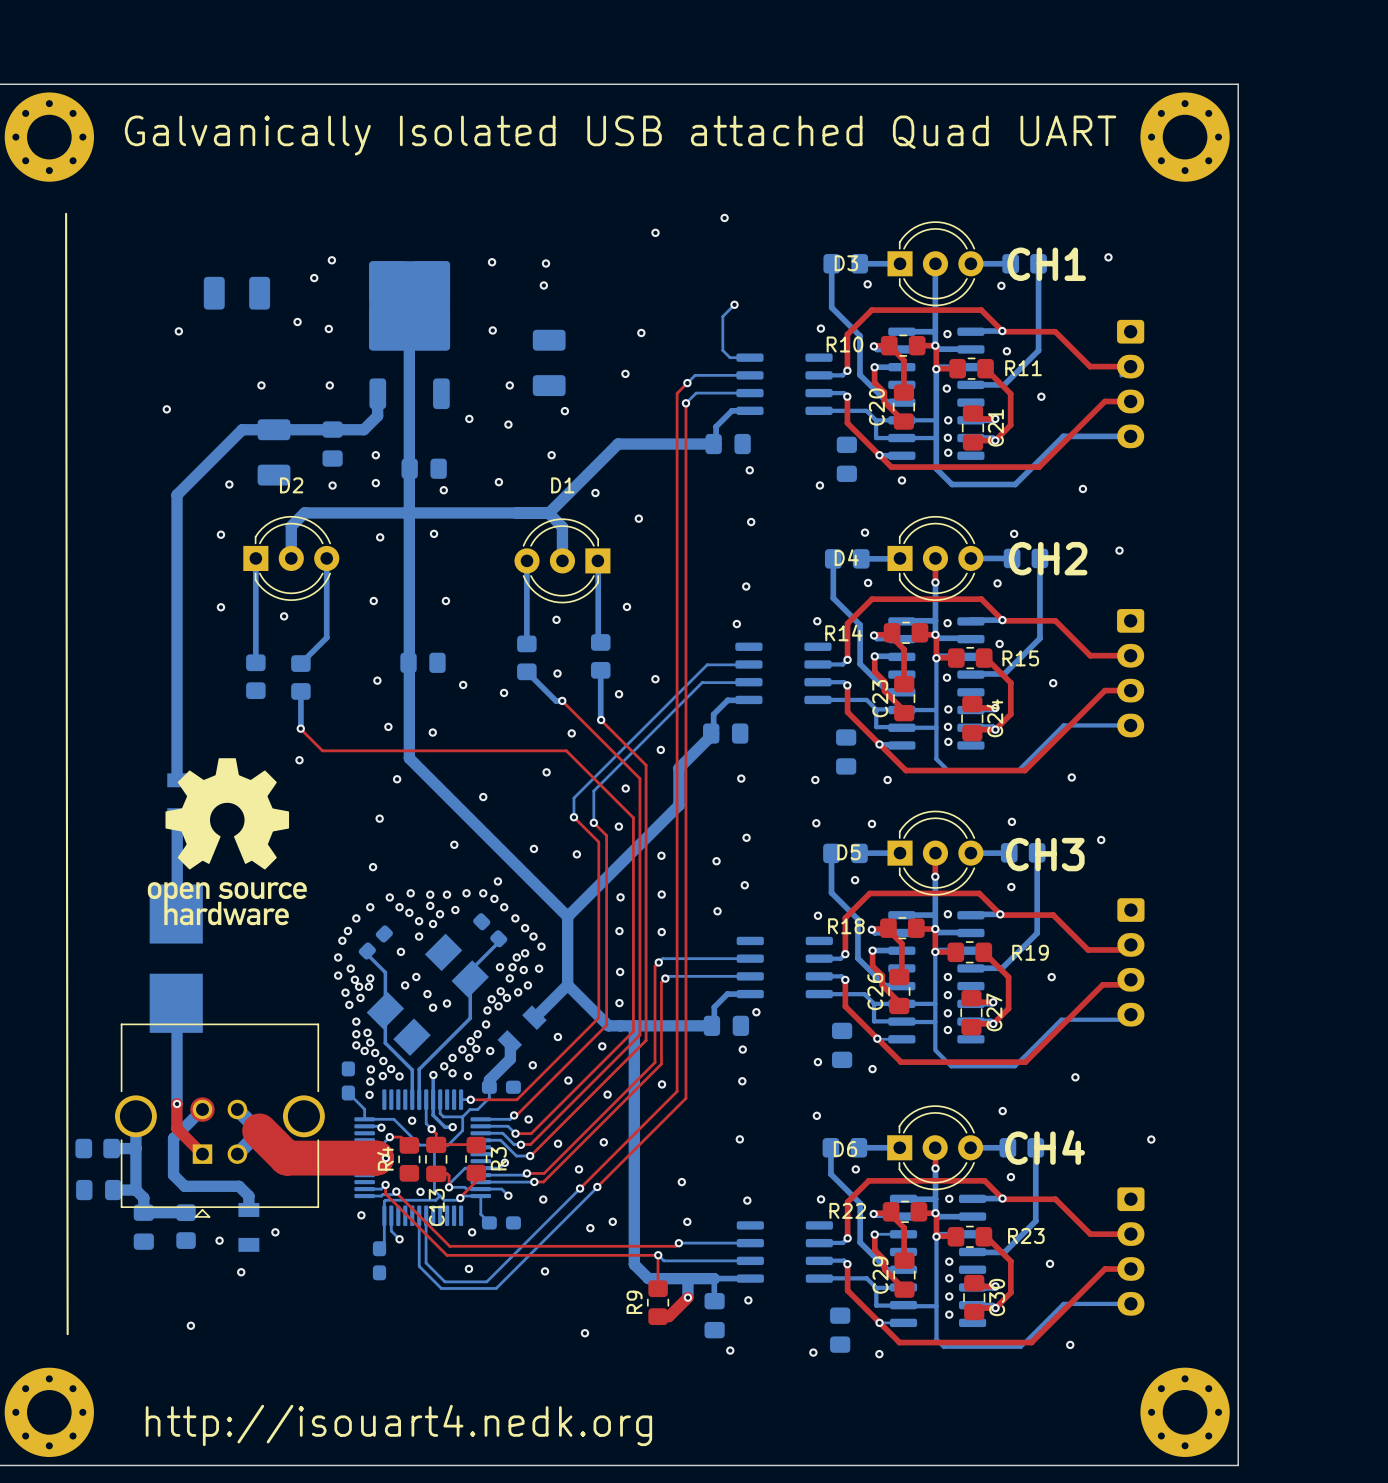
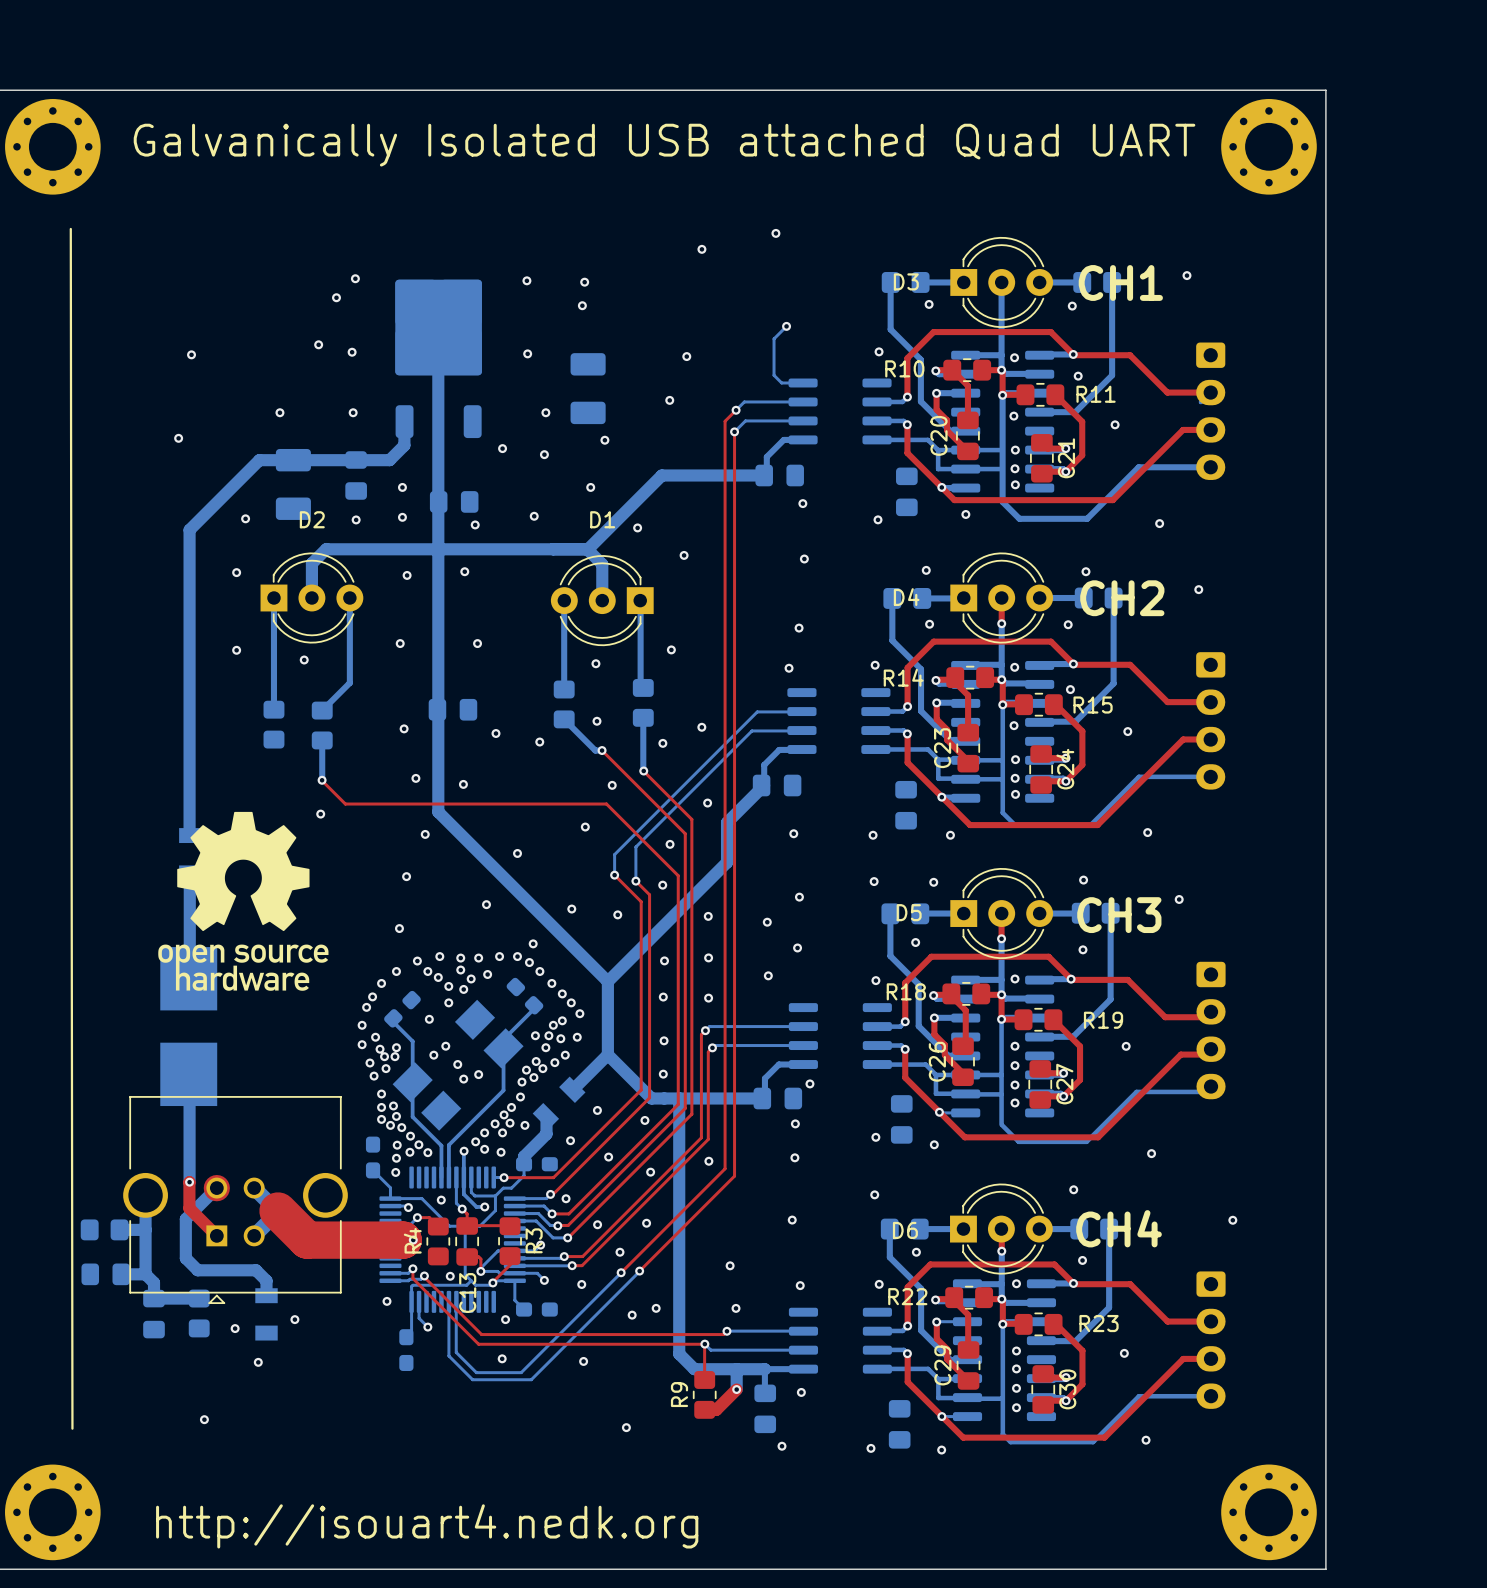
part: (236, 293) -> none

